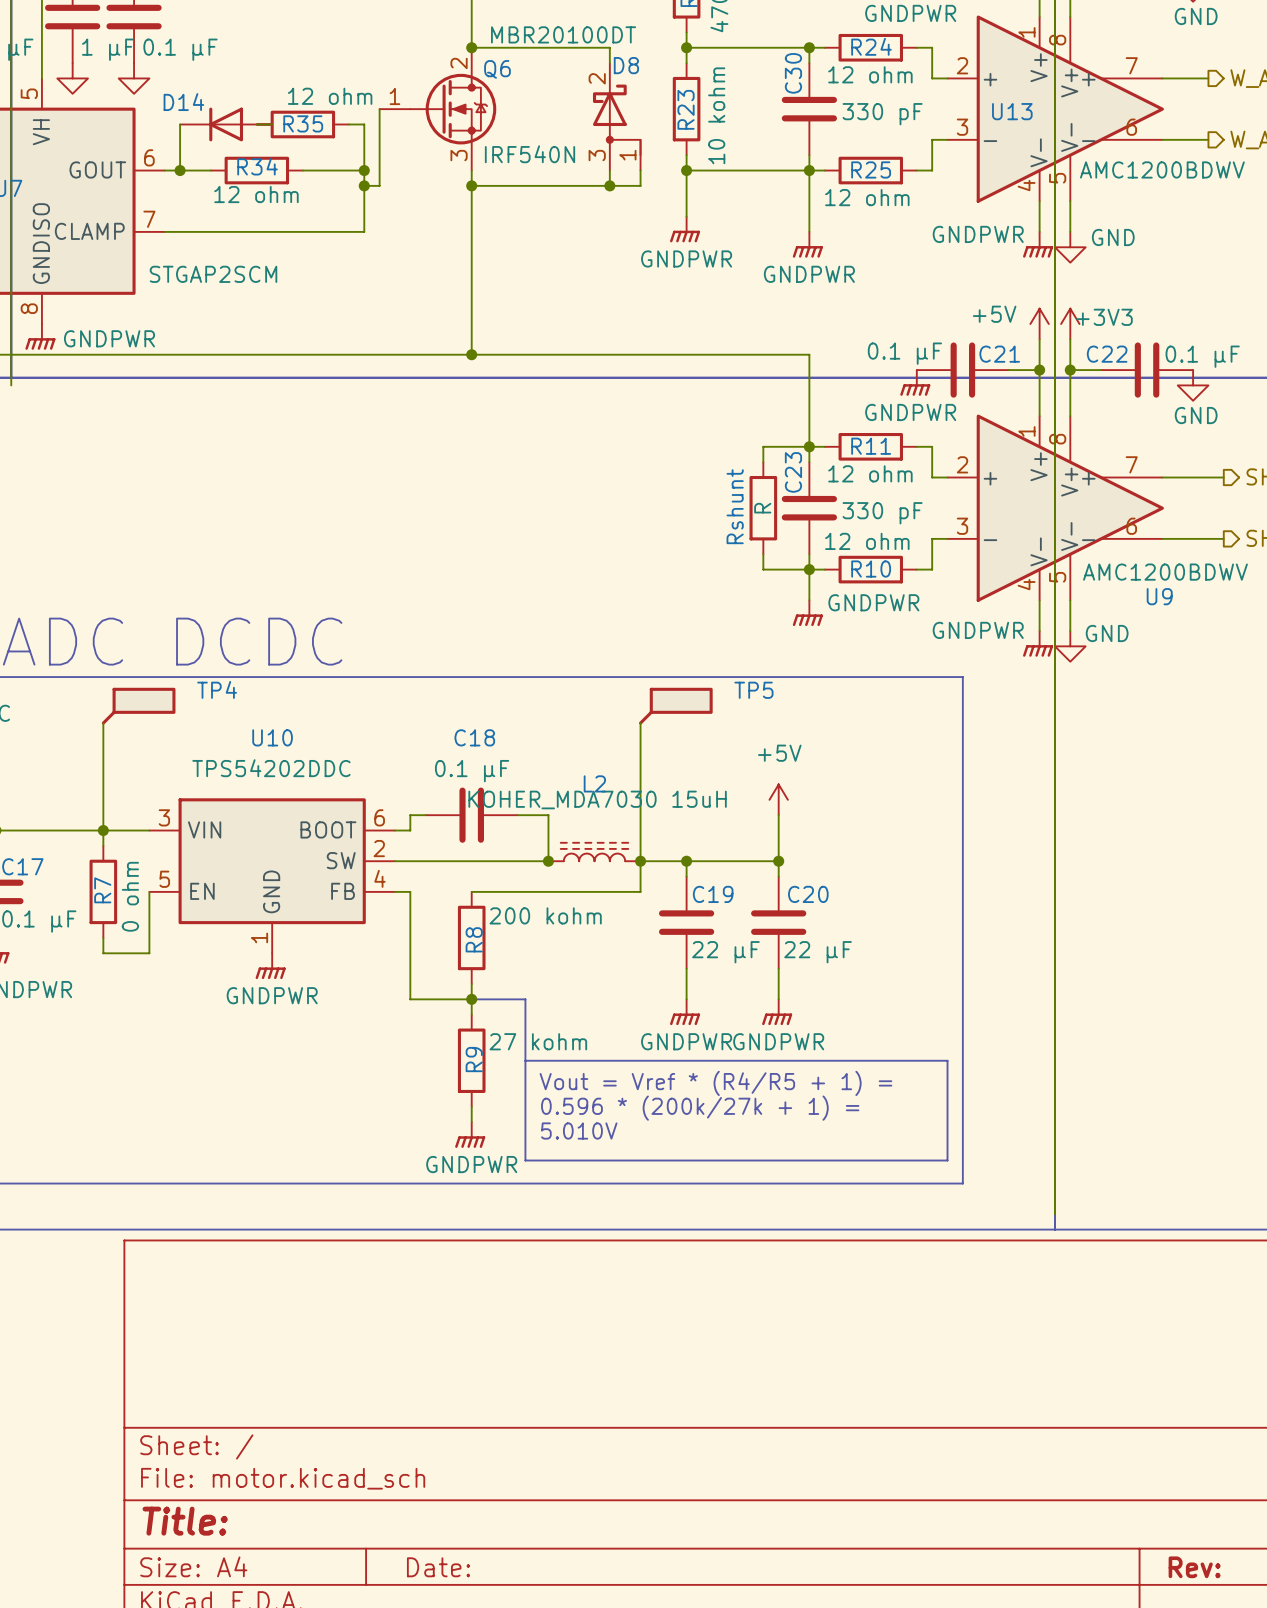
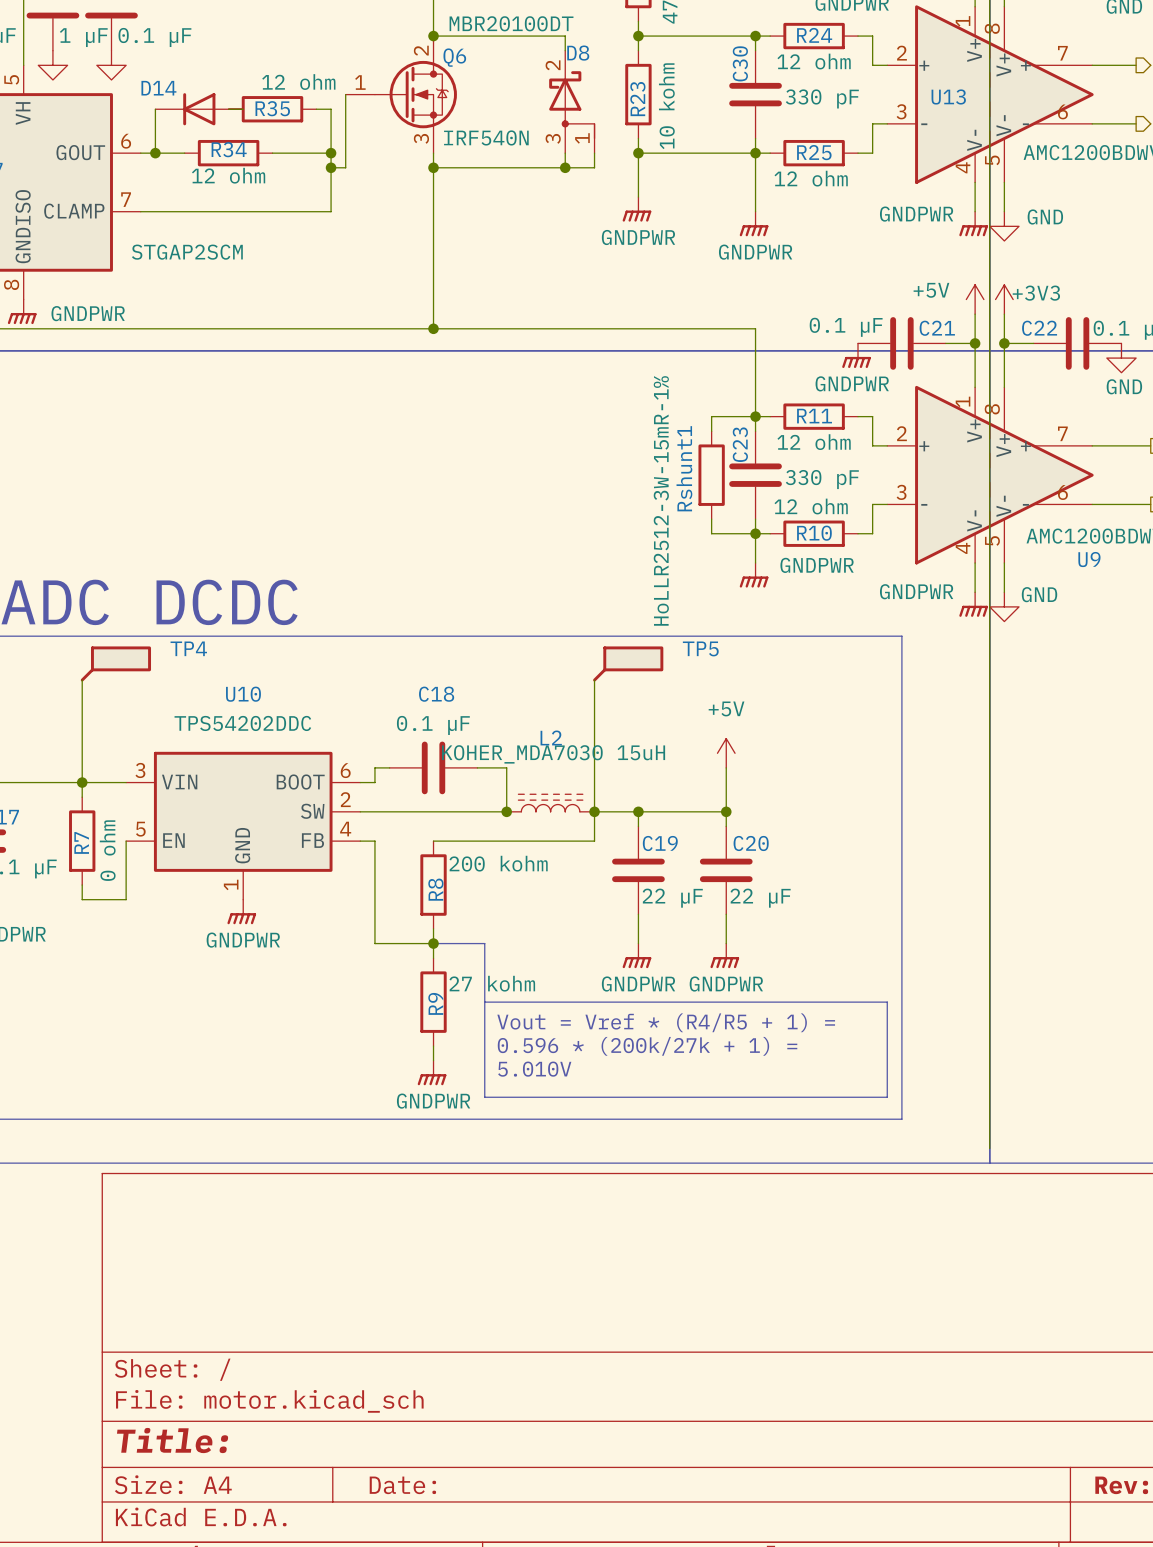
Rshunt name: Rshunt (735, 506) -> Rshunt1 (684, 468)
Rshunt value: R (762, 508) -> HoLLR2512-3W-15mR-1% (661, 500)

